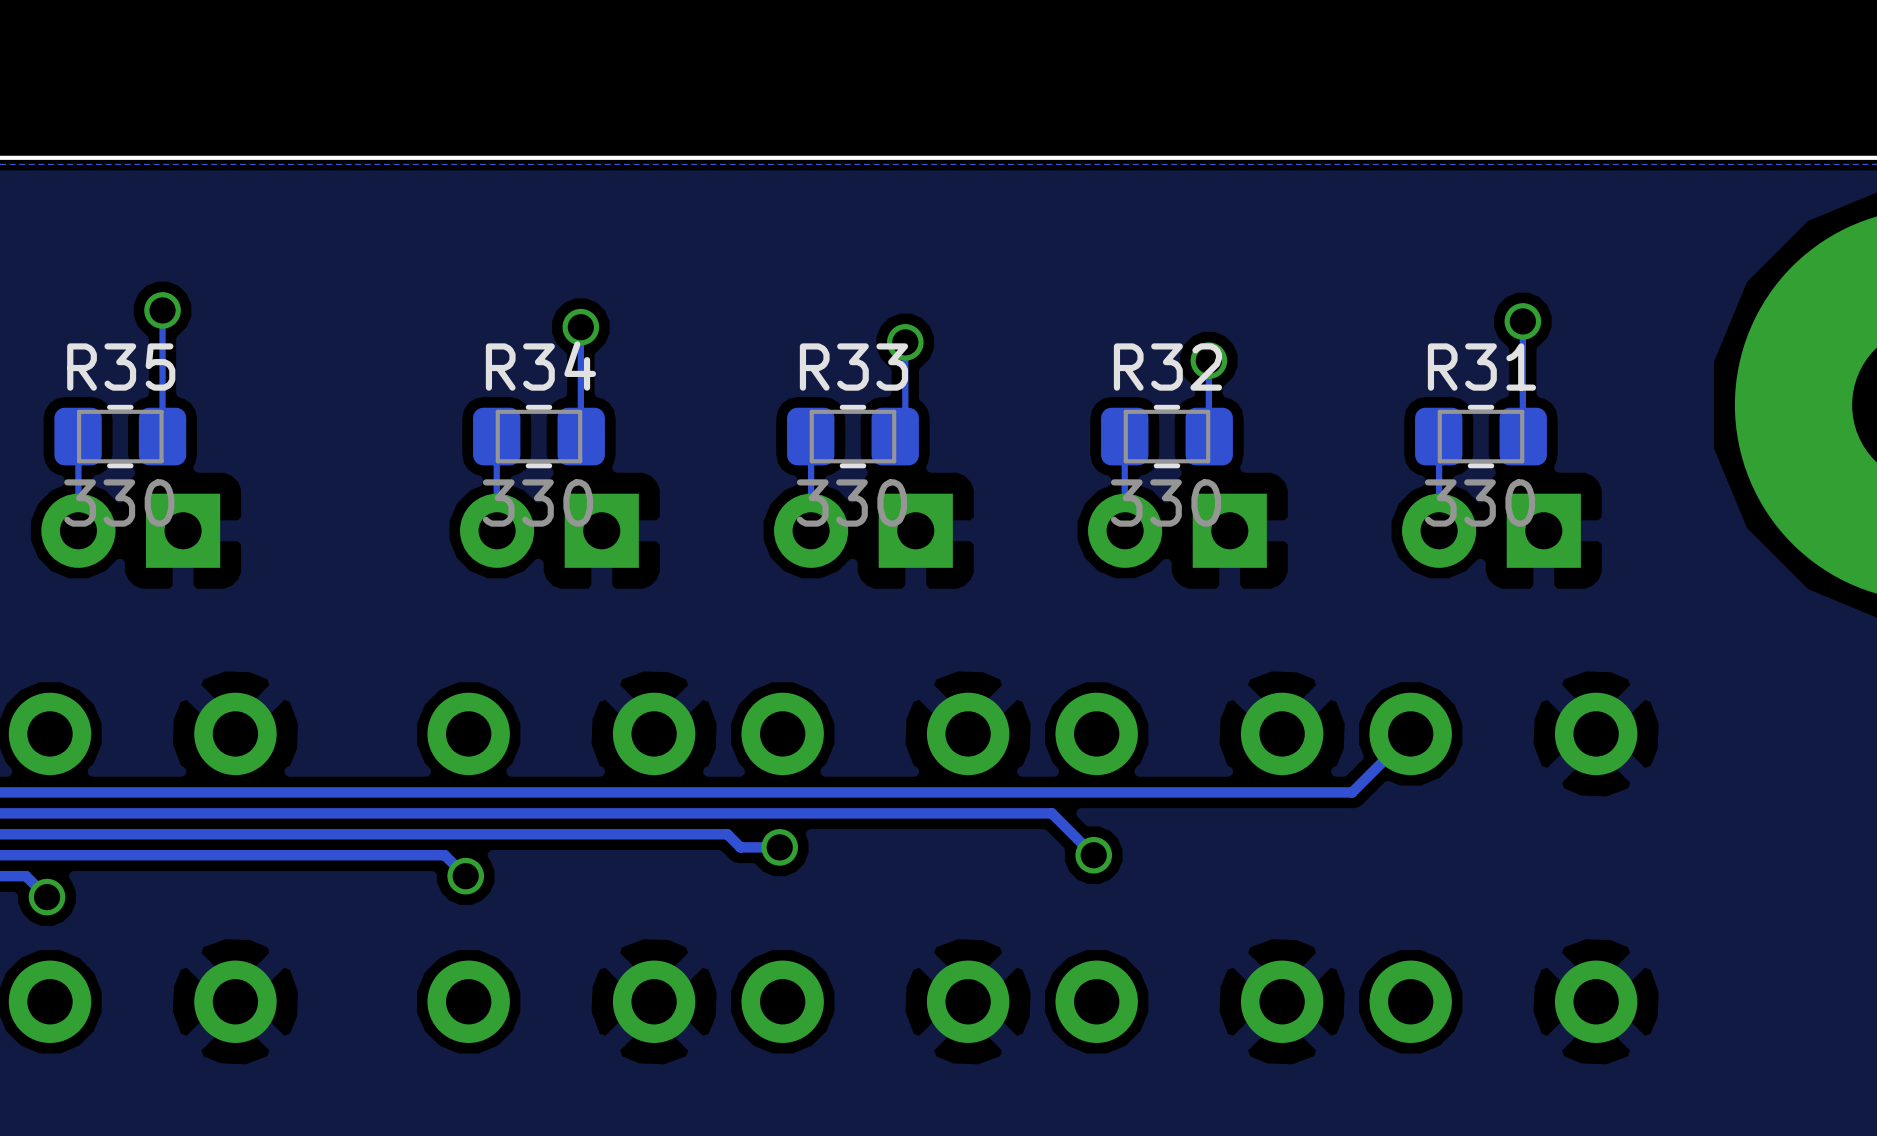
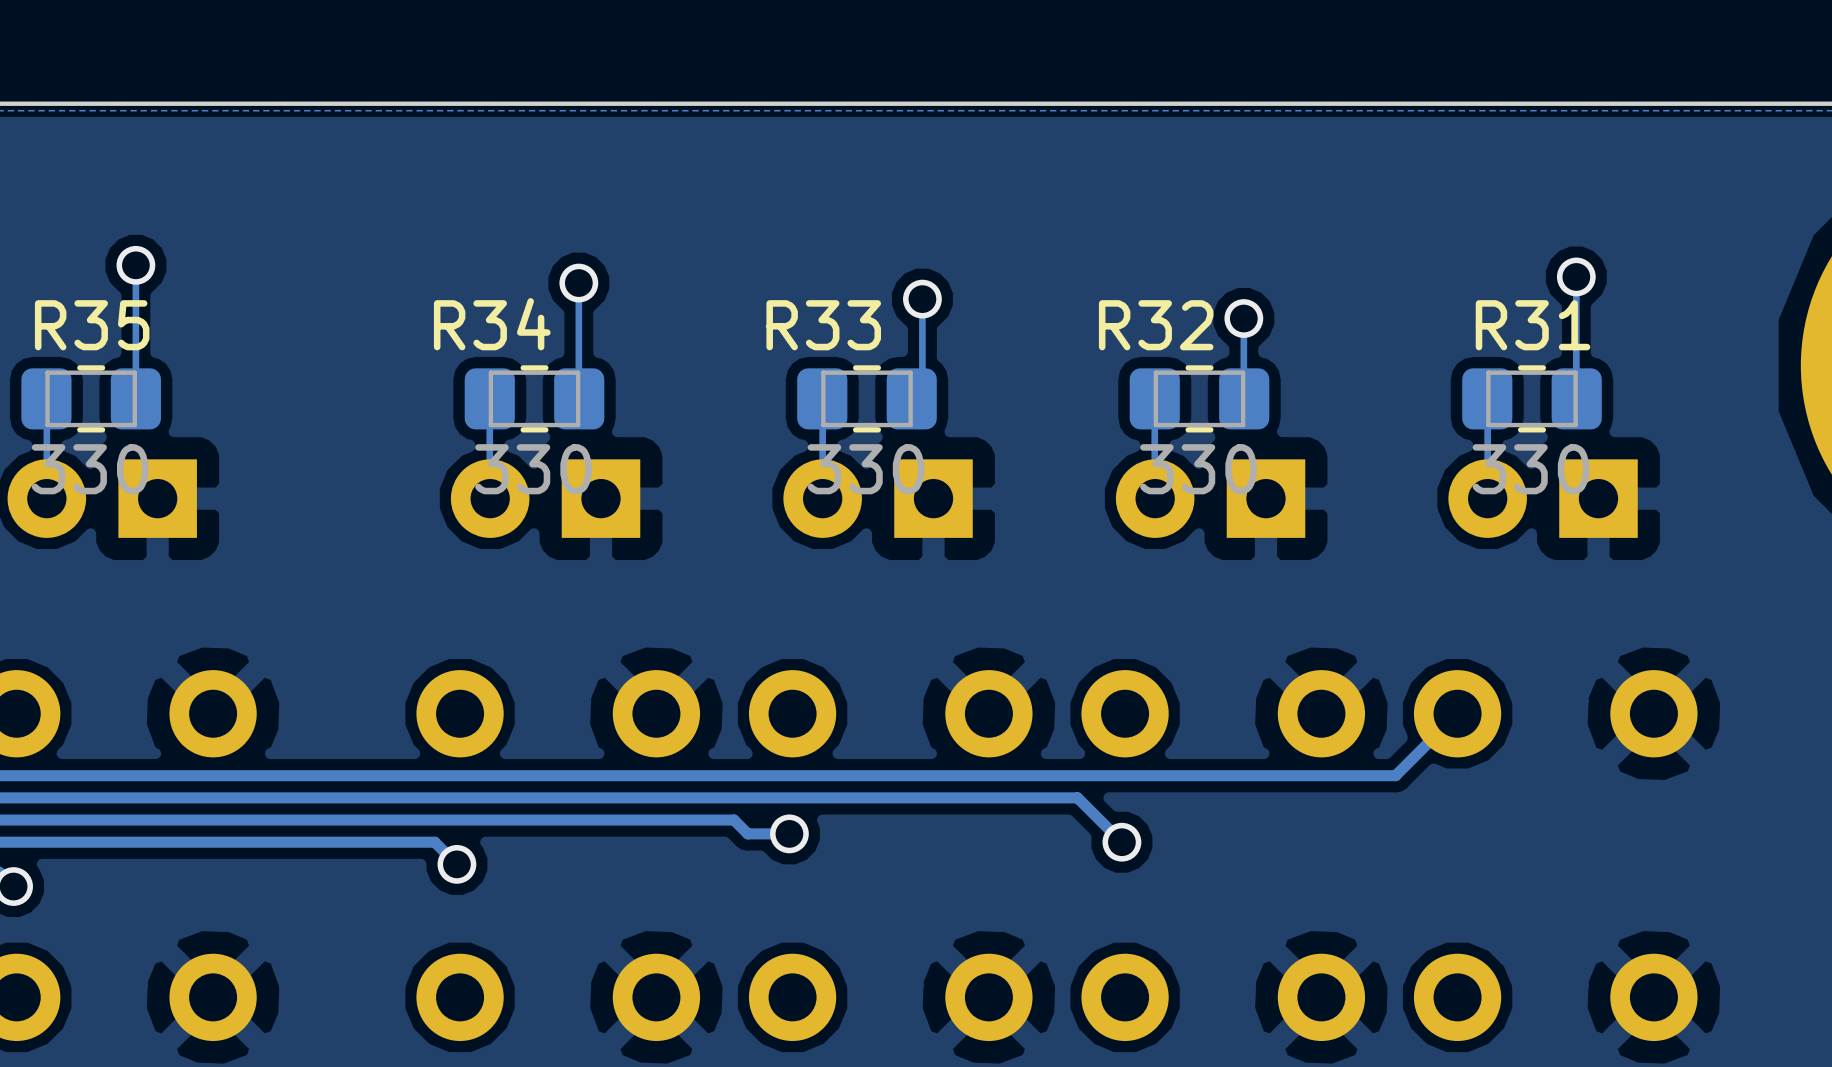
R34 name position: R34 (540, 366) -> R34 (492, 324)
R33 name position: R33 (853, 367) -> R33 (823, 325)
R32 name position: R32 (1167, 367) -> R32 (1156, 325)

